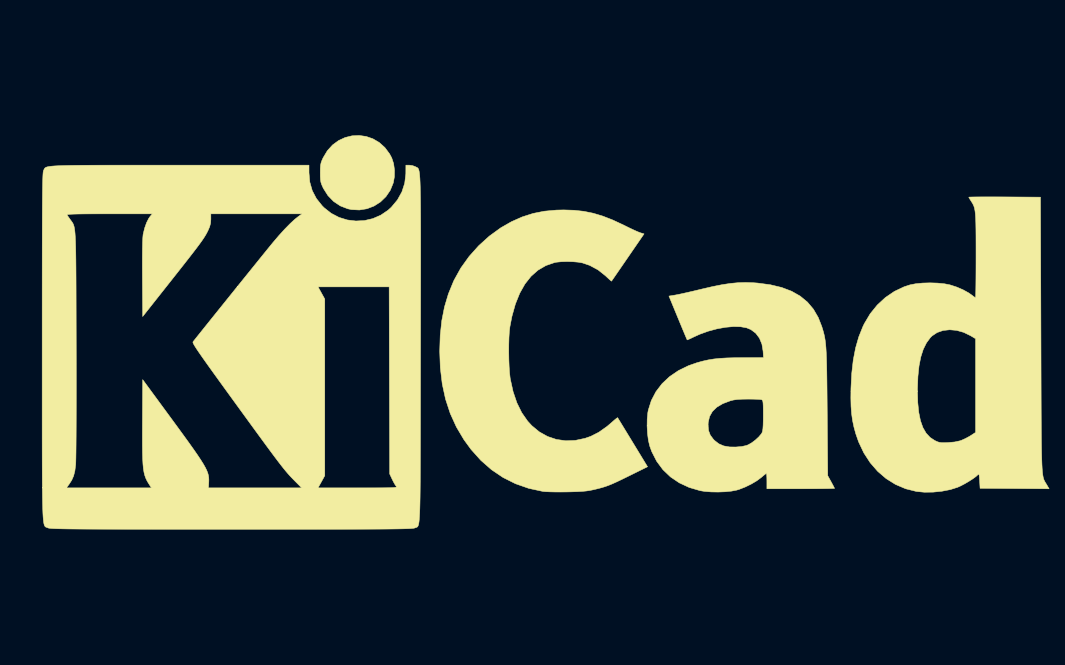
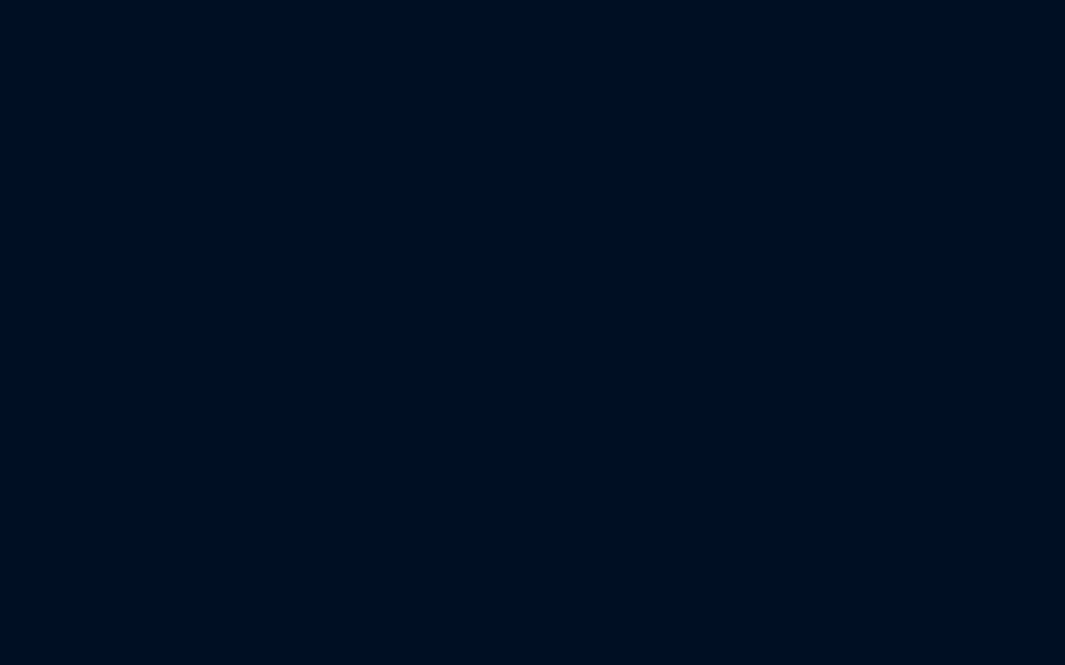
drawing: [41, 135, 1050, 530] -> none

